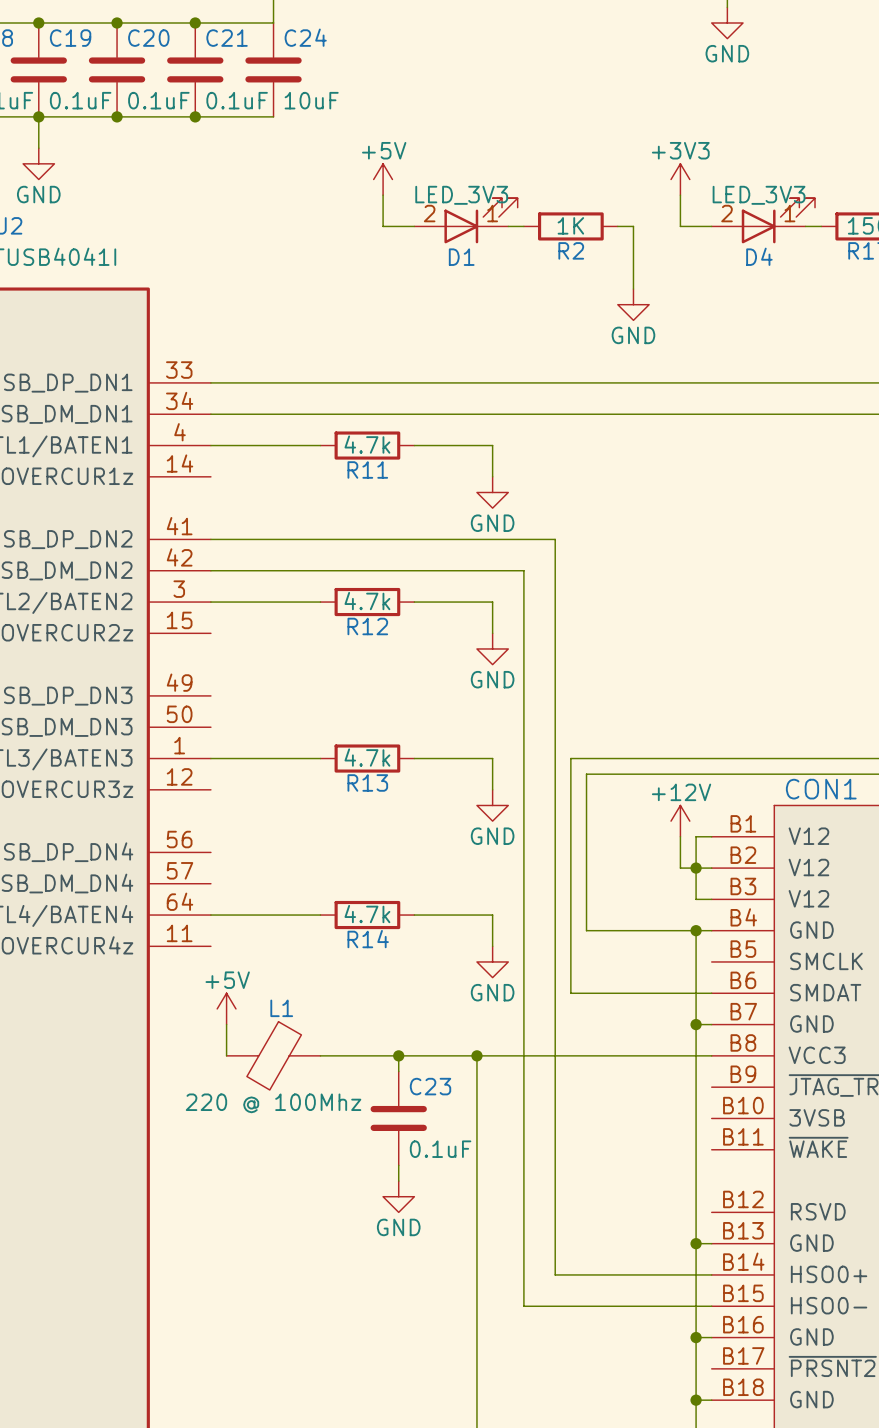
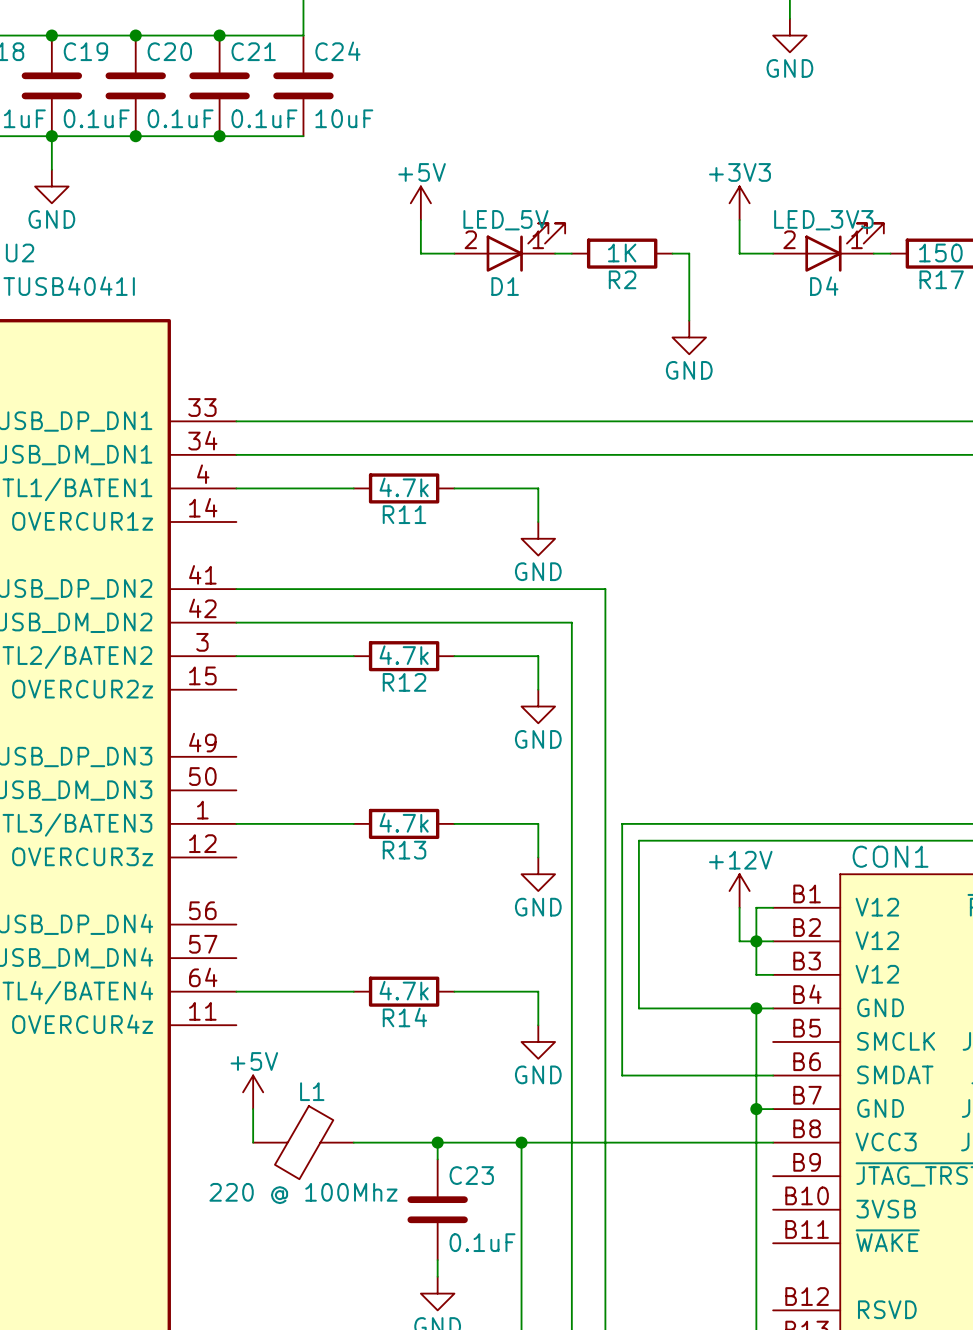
D1 value: LED_3V3 (461, 195) -> LED_5V (505, 220)

